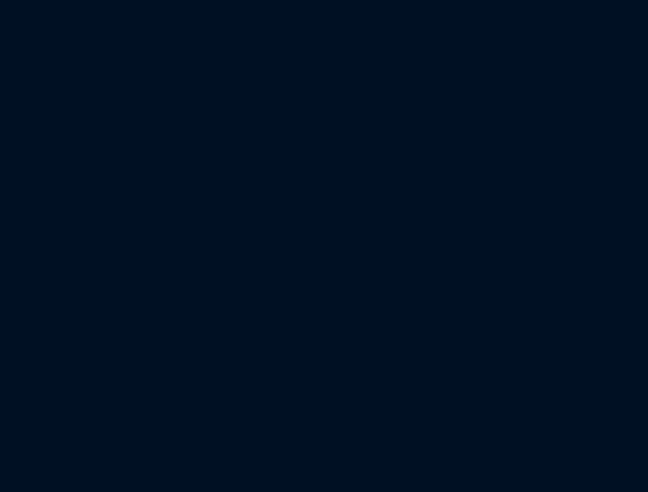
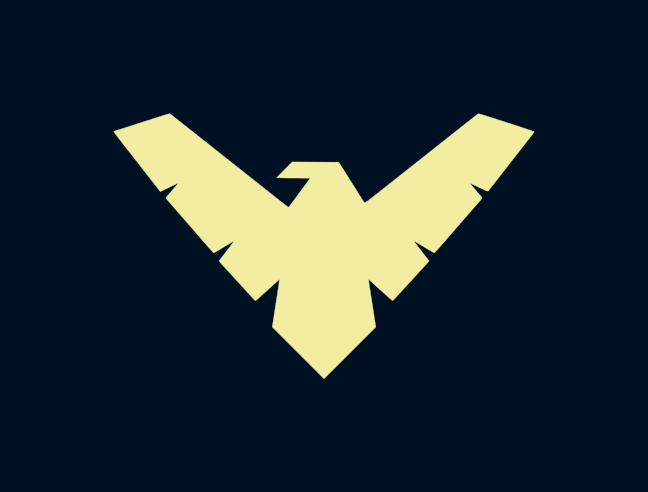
drawing: none -> [113, 113, 535, 379]

